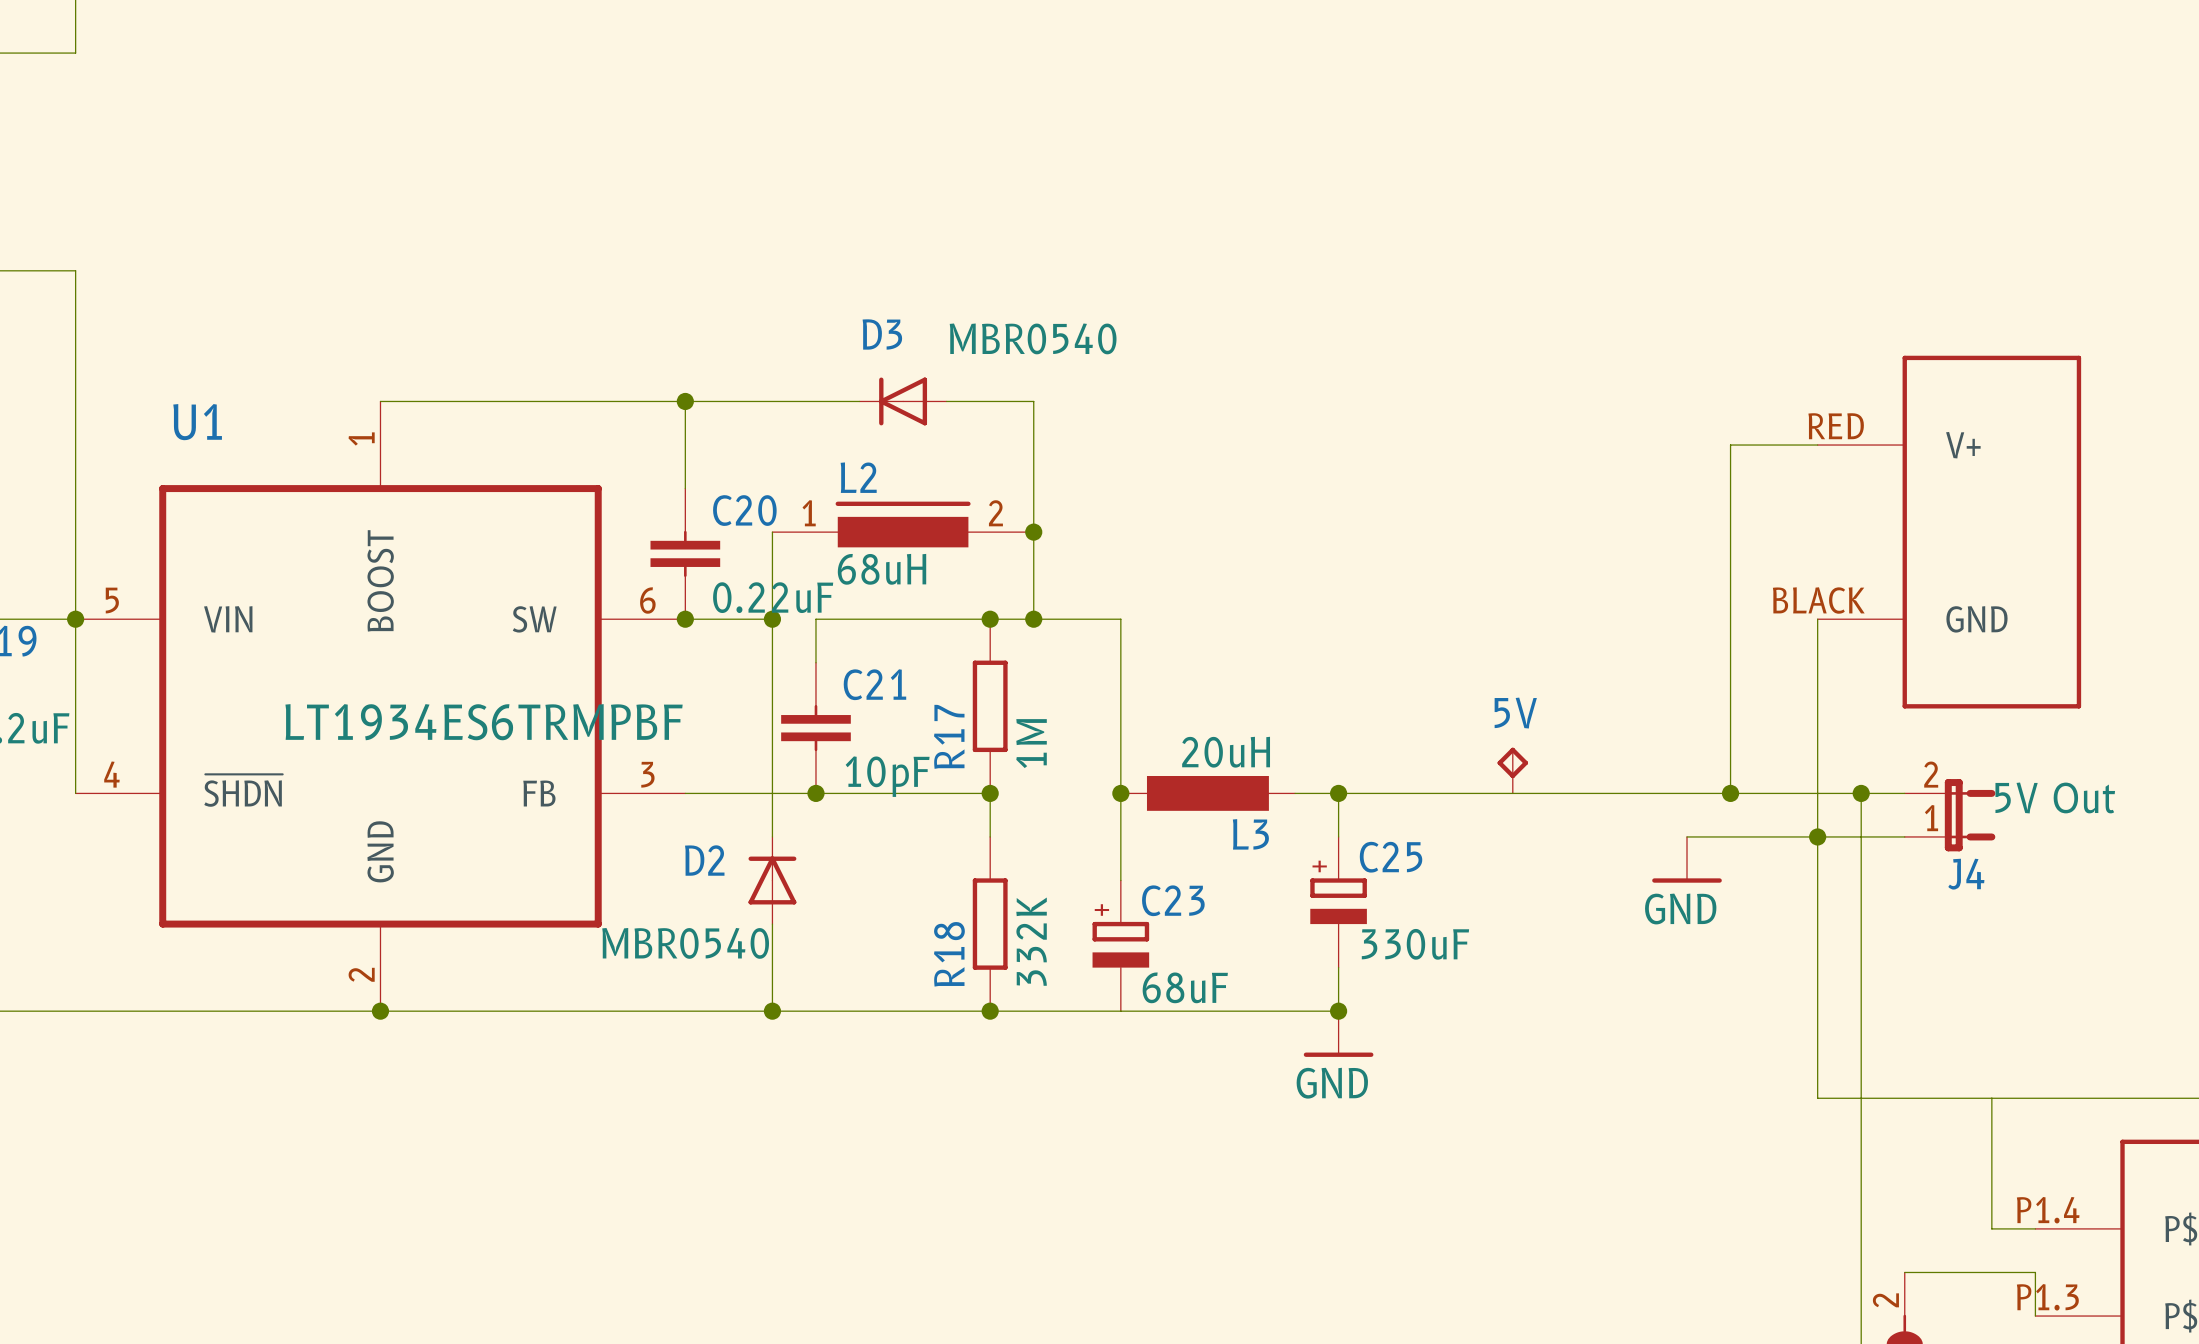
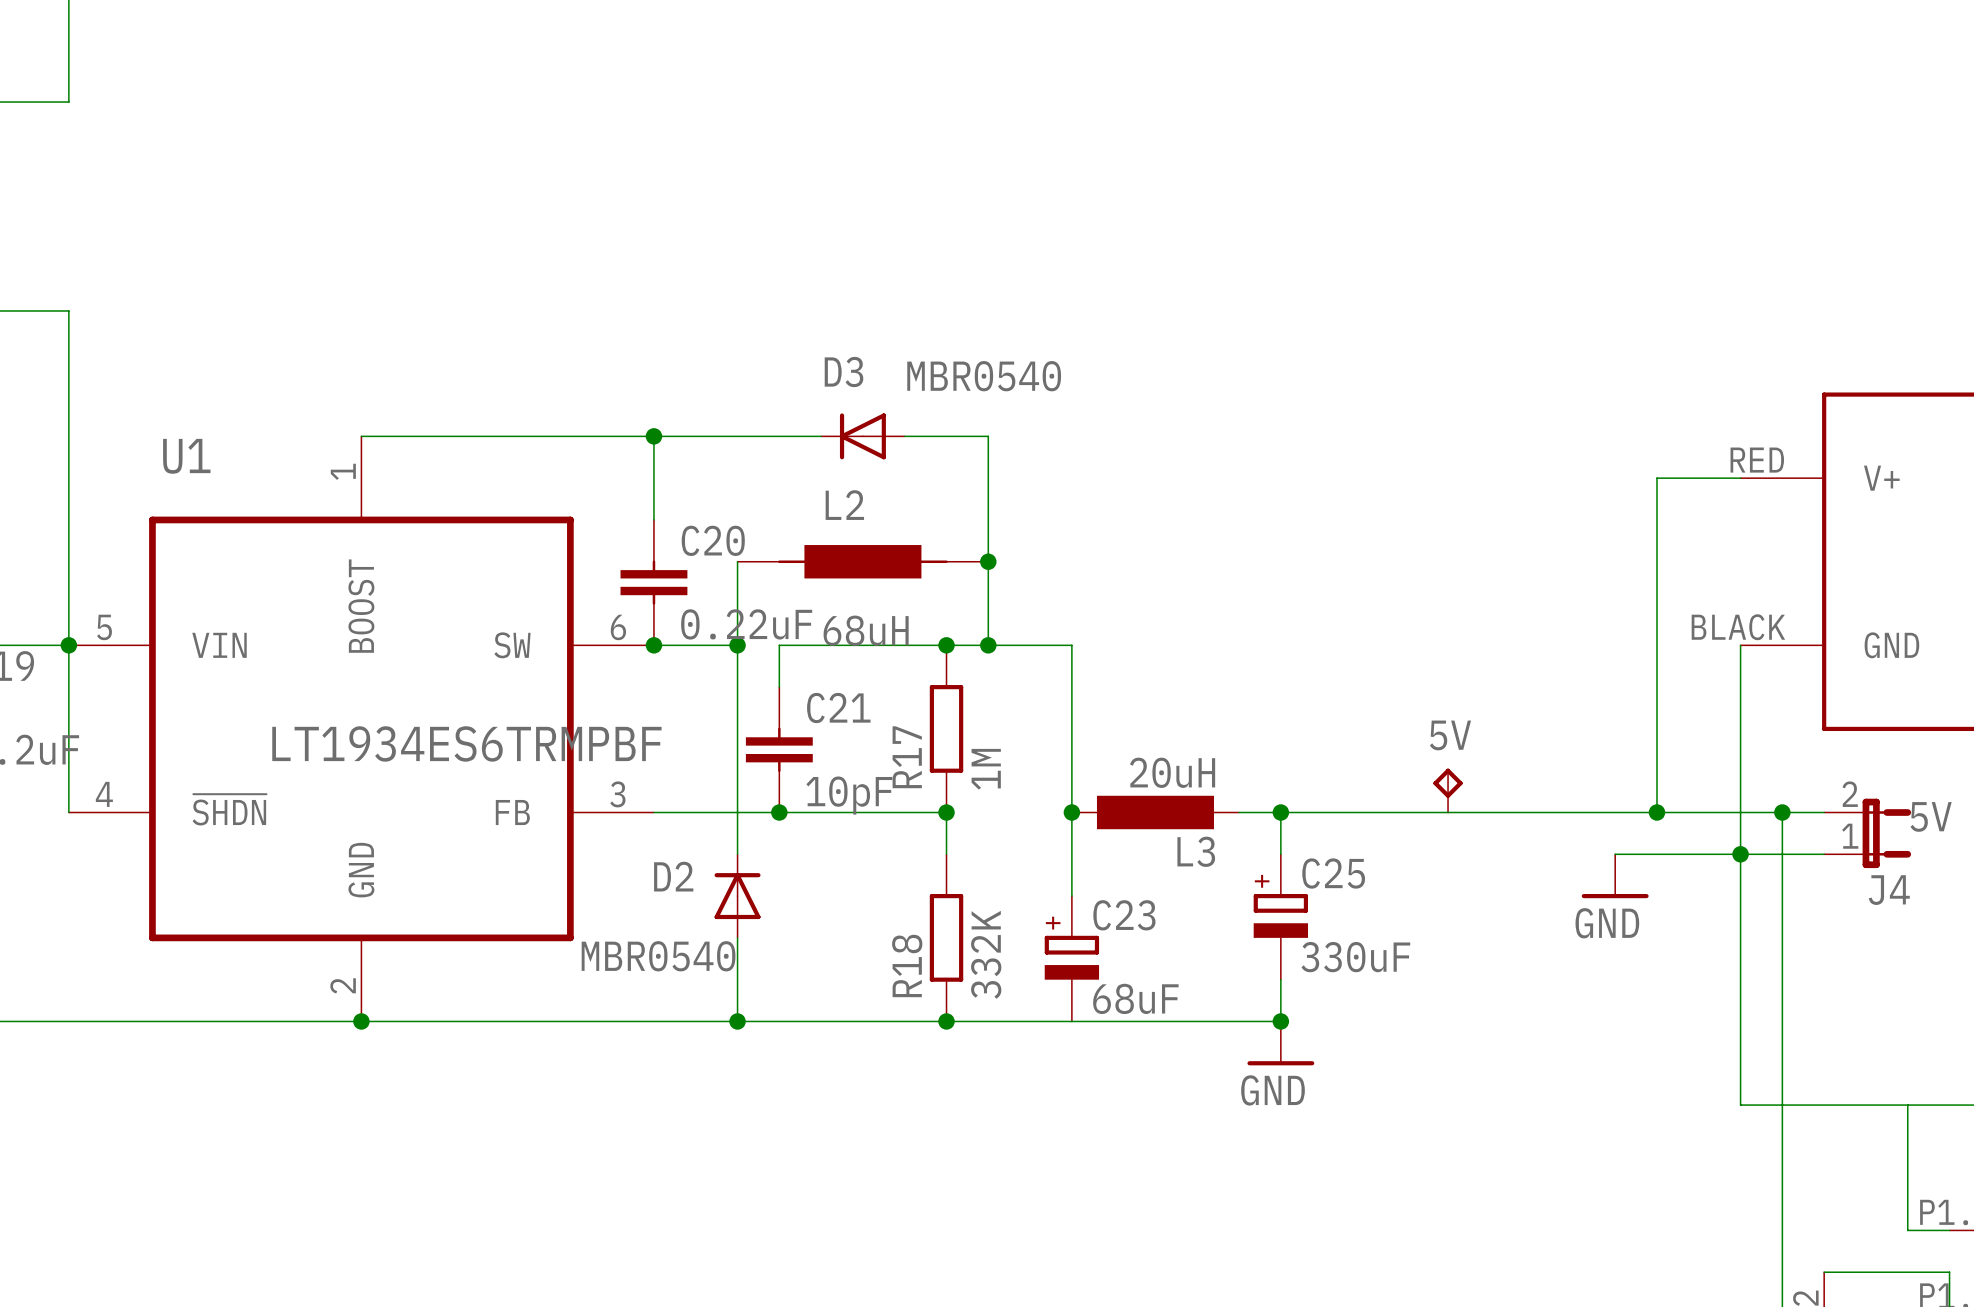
L2 symbol: [772, 501, 1034, 548] -> [737, 545, 989, 579]
L2 value position: 68uH (882, 569) -> 68uH (866, 630)

